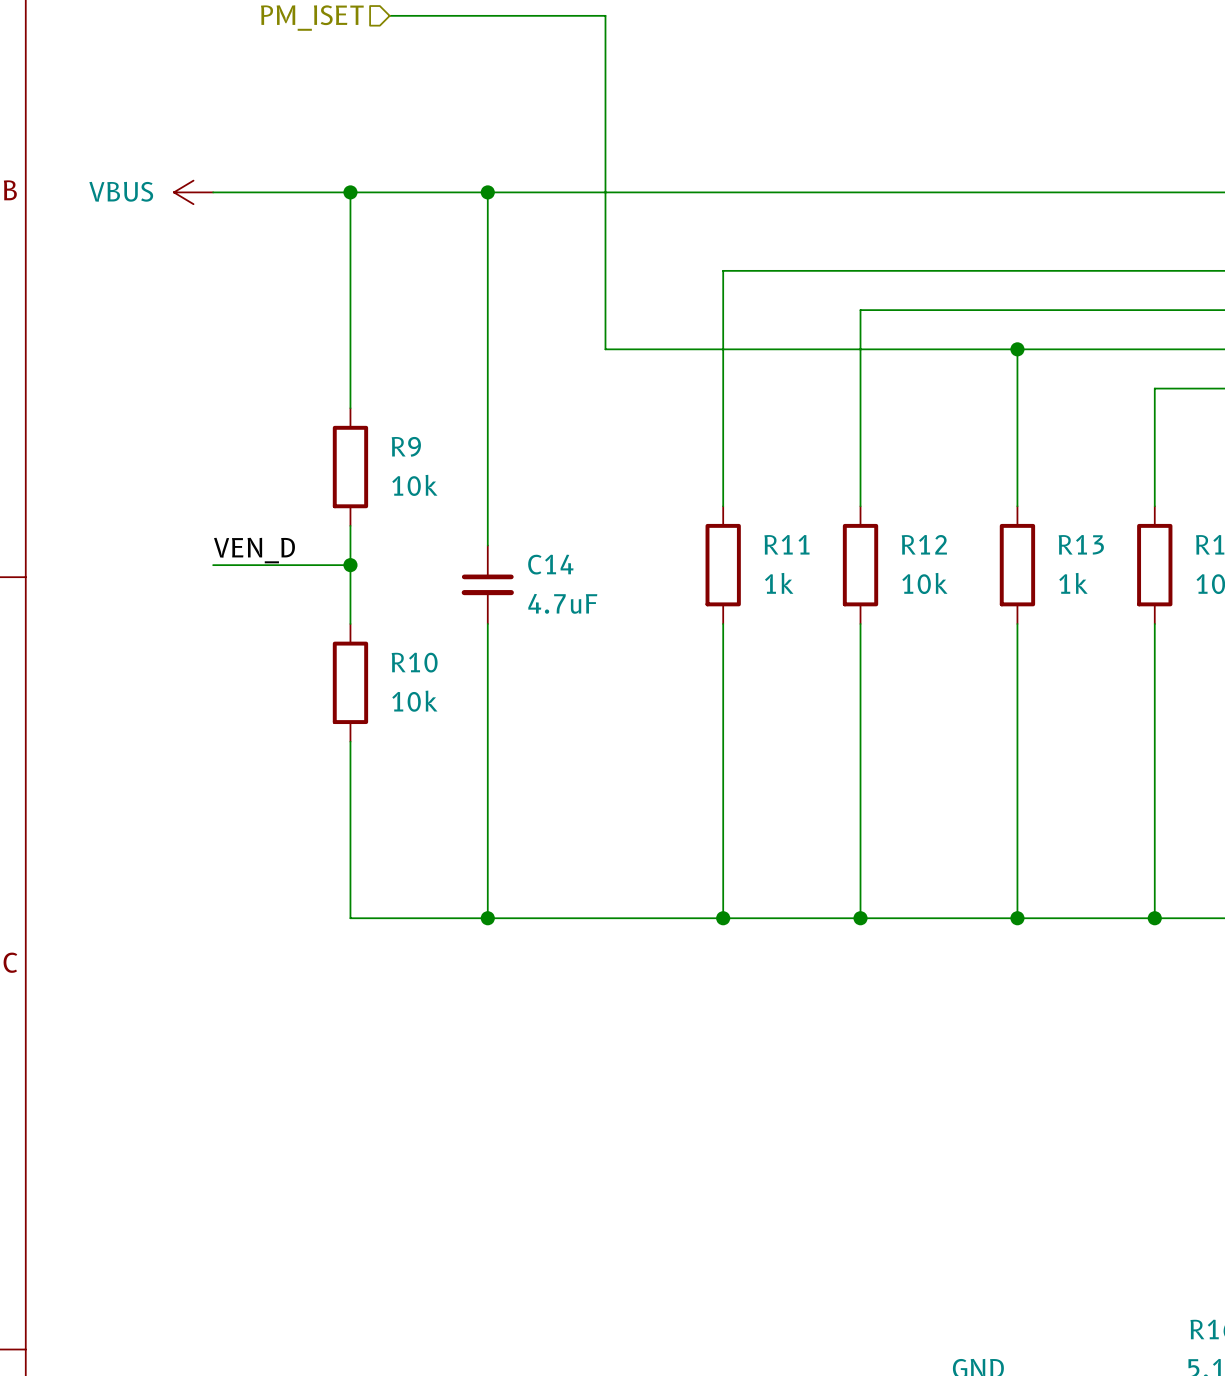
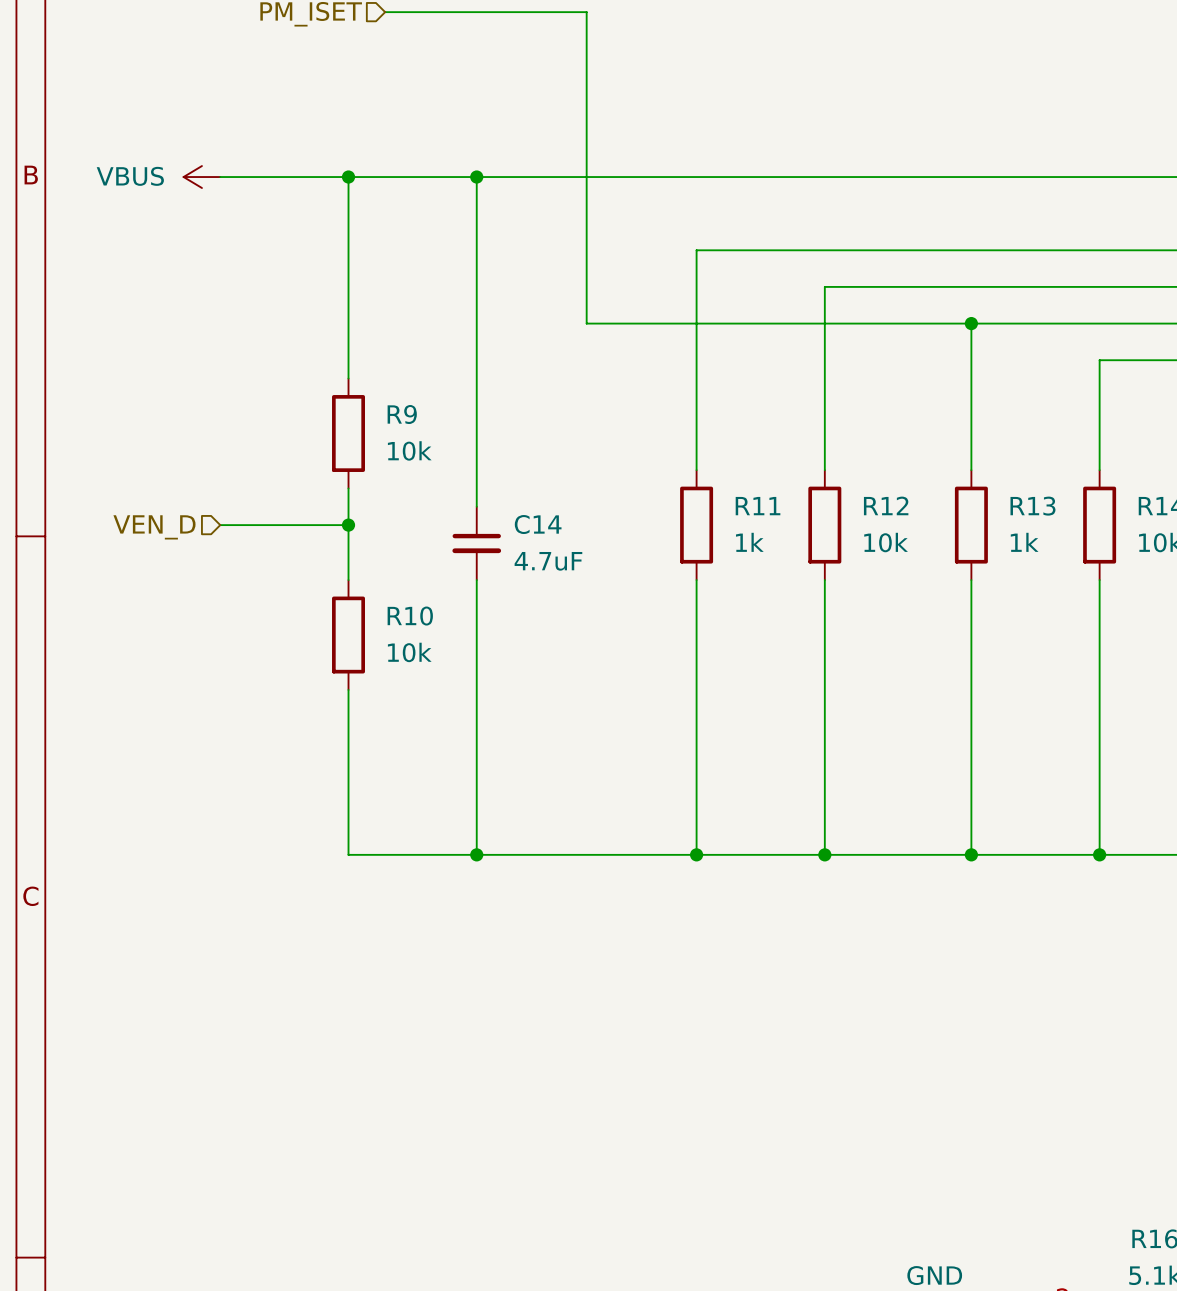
label: VEN_D (254, 550) -> none
hierarchical label: none -> VEN_D (154, 527)

